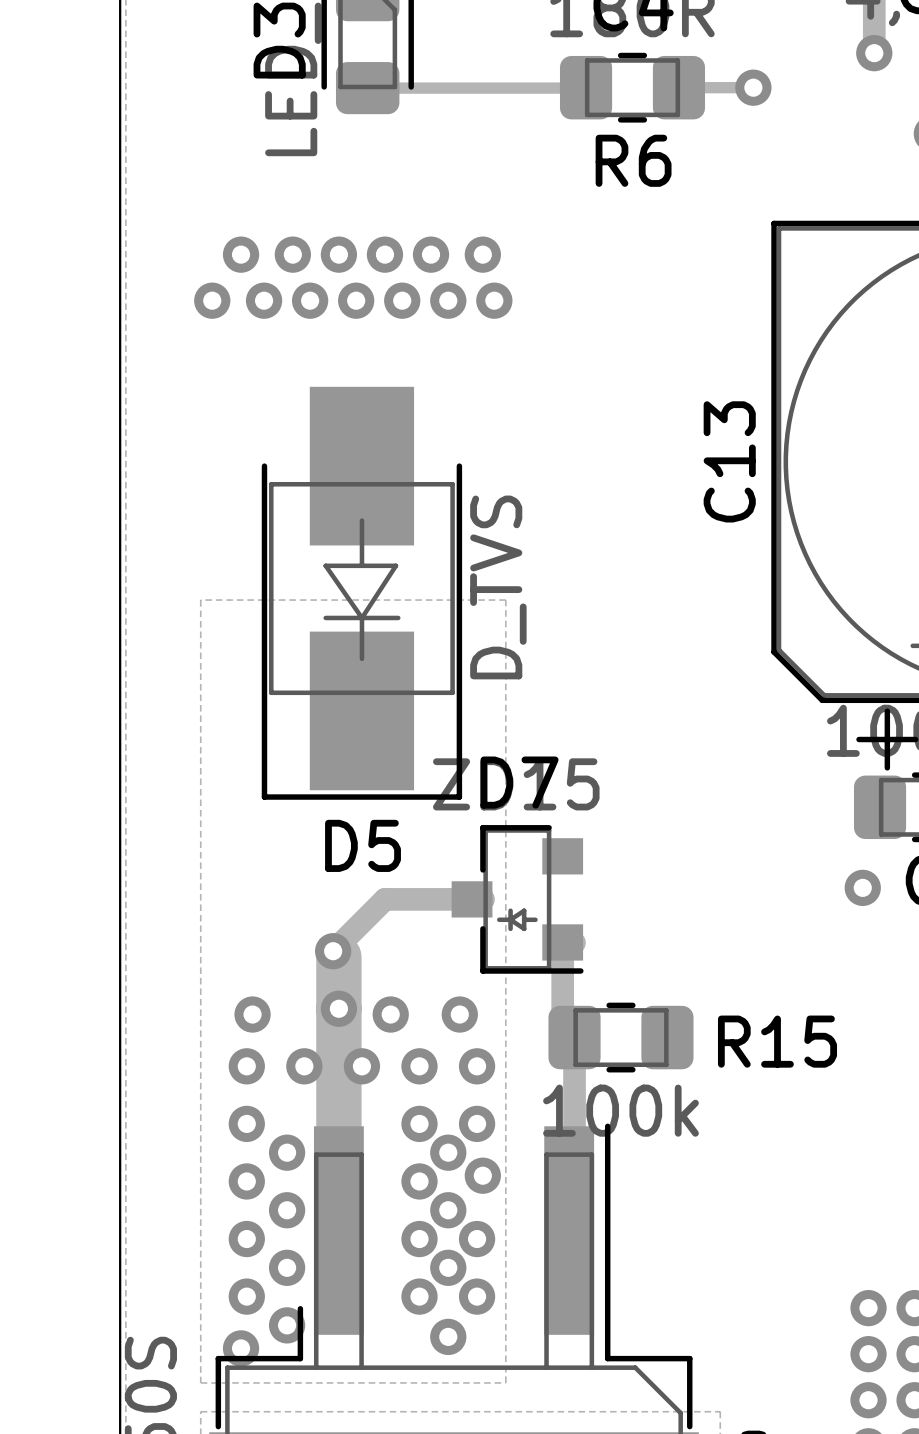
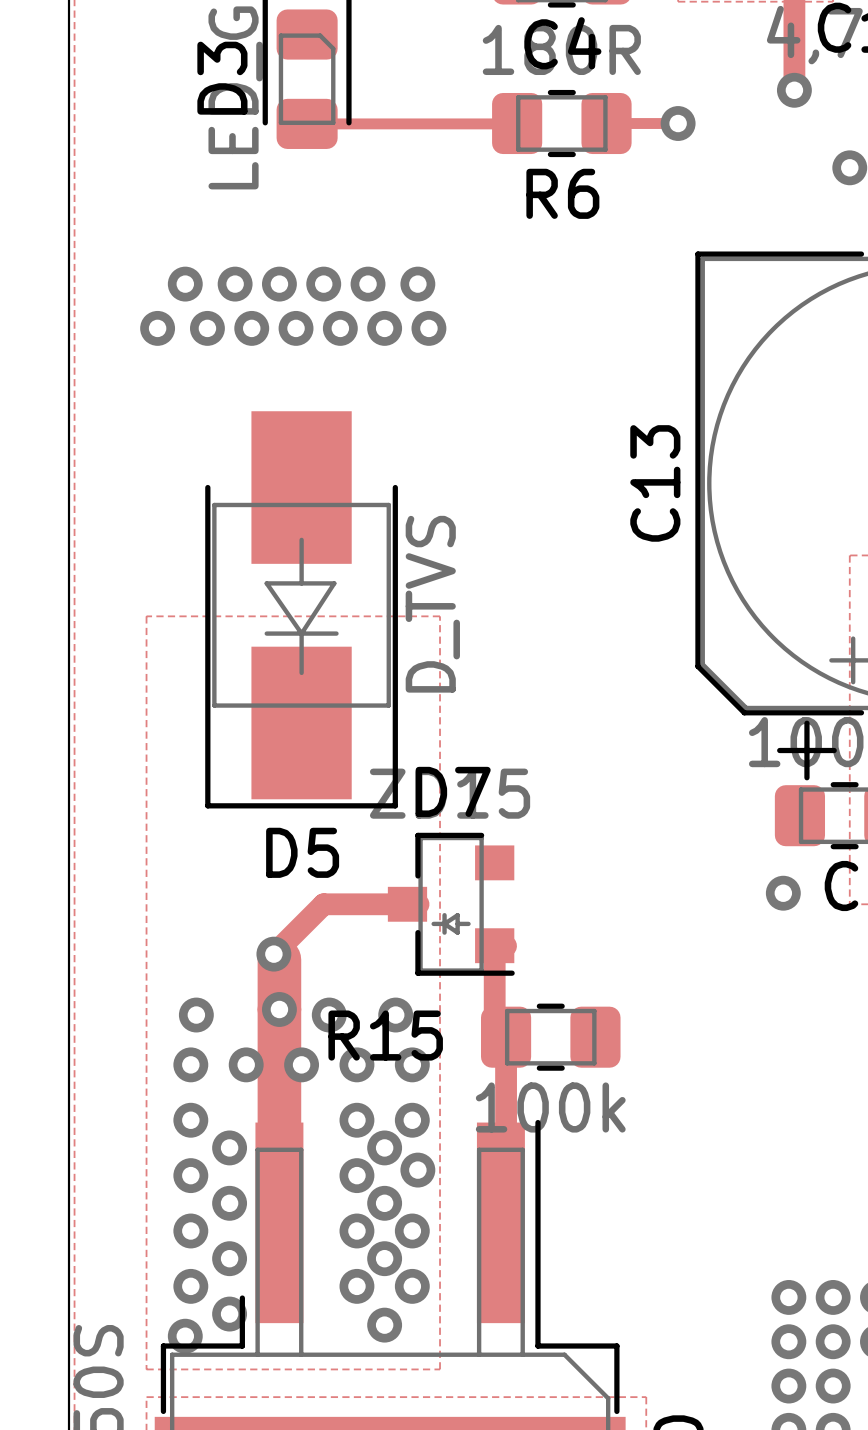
R15 name position: R15 (777, 1041) -> R15 (385, 1035)

